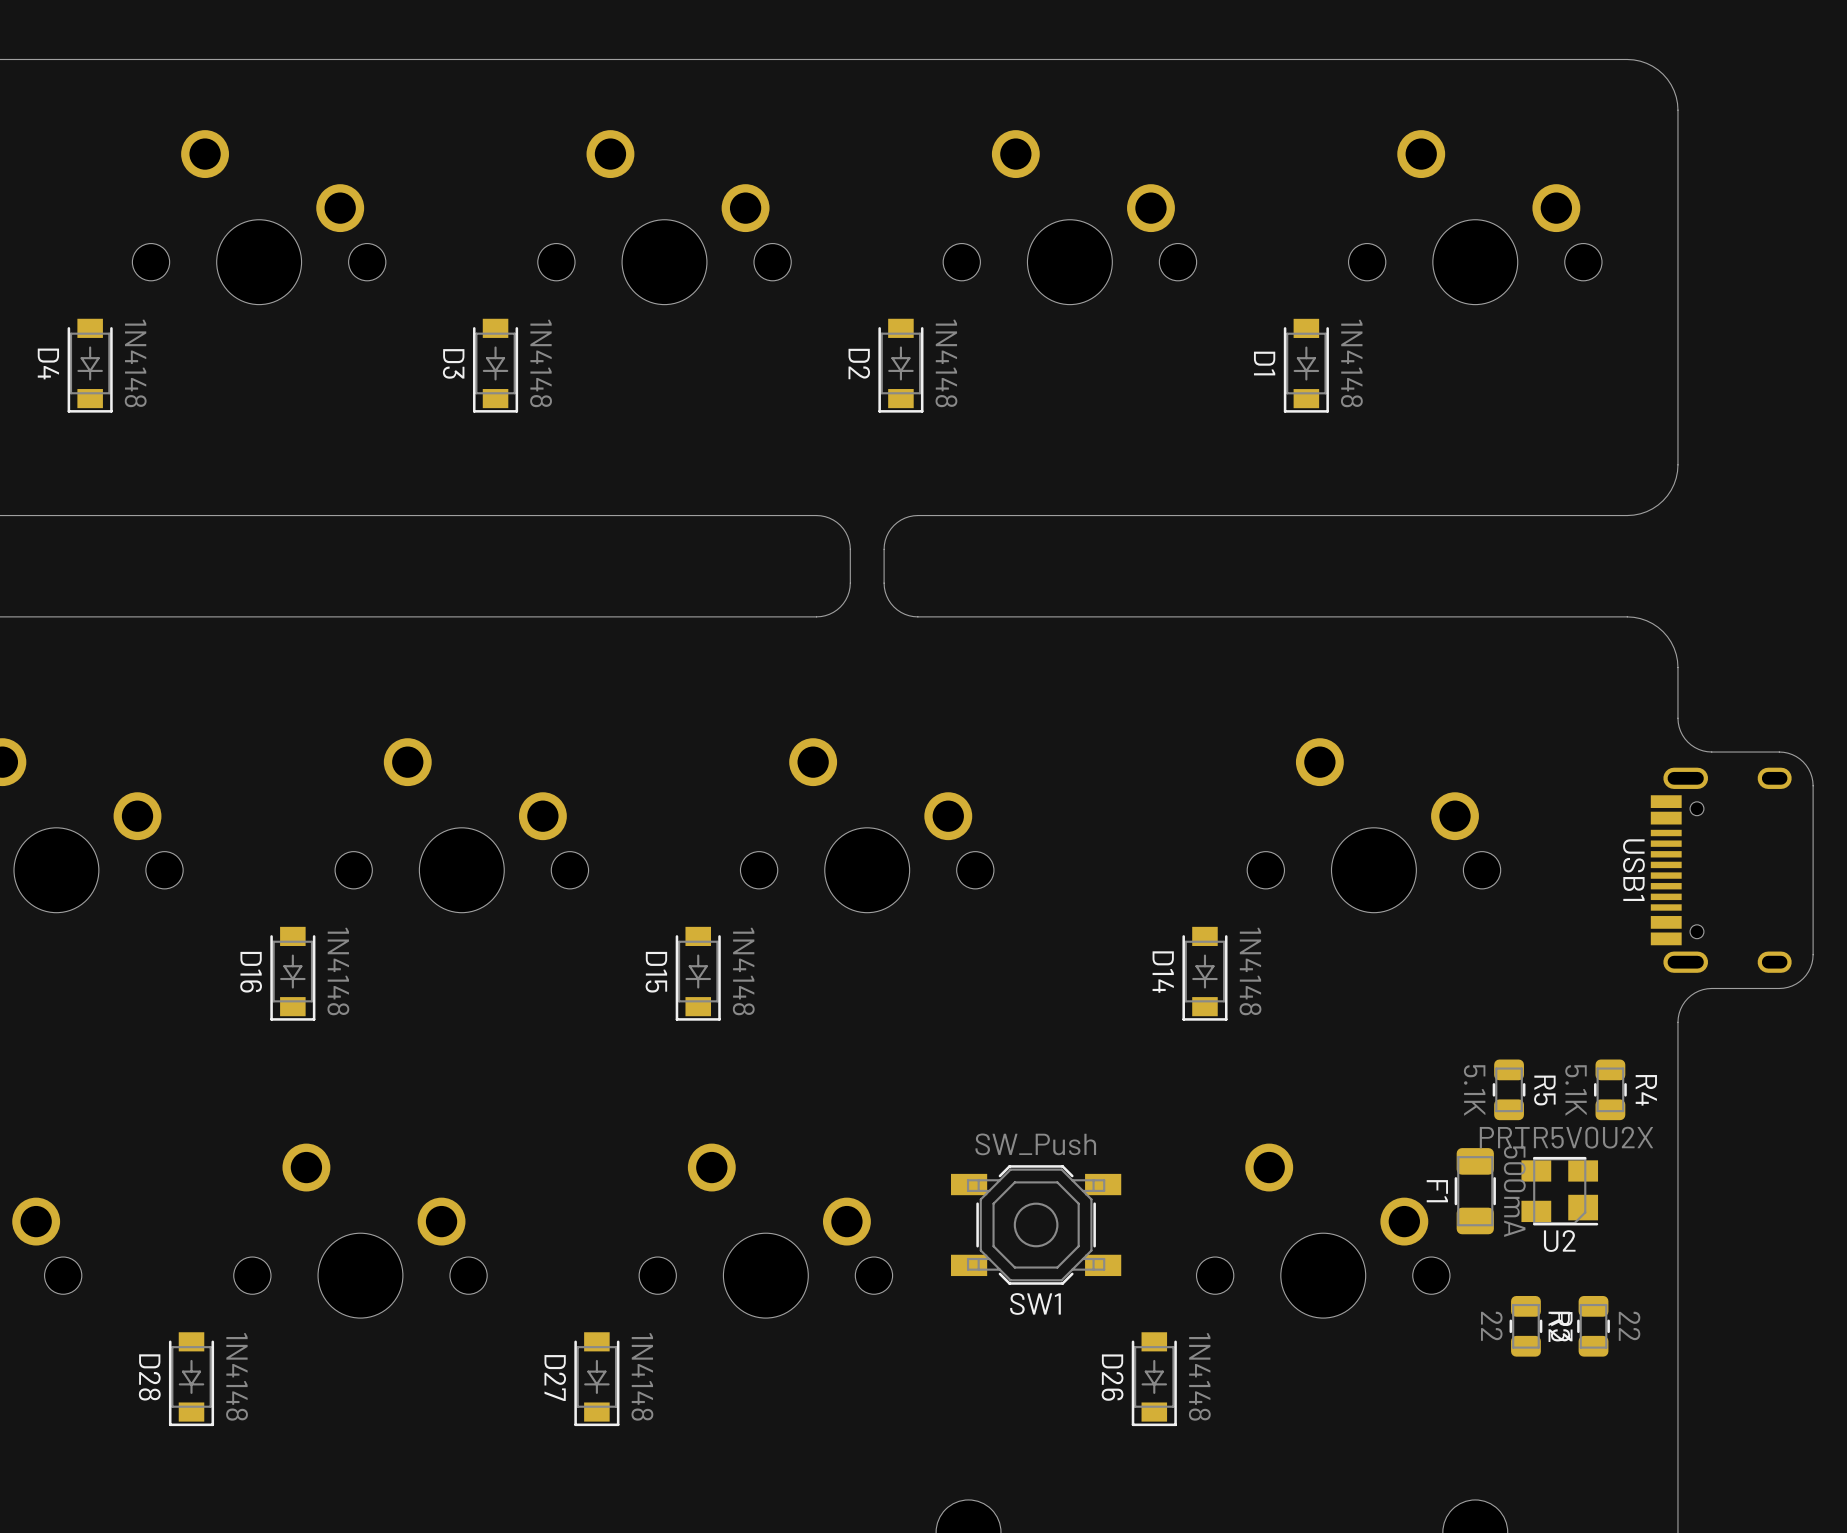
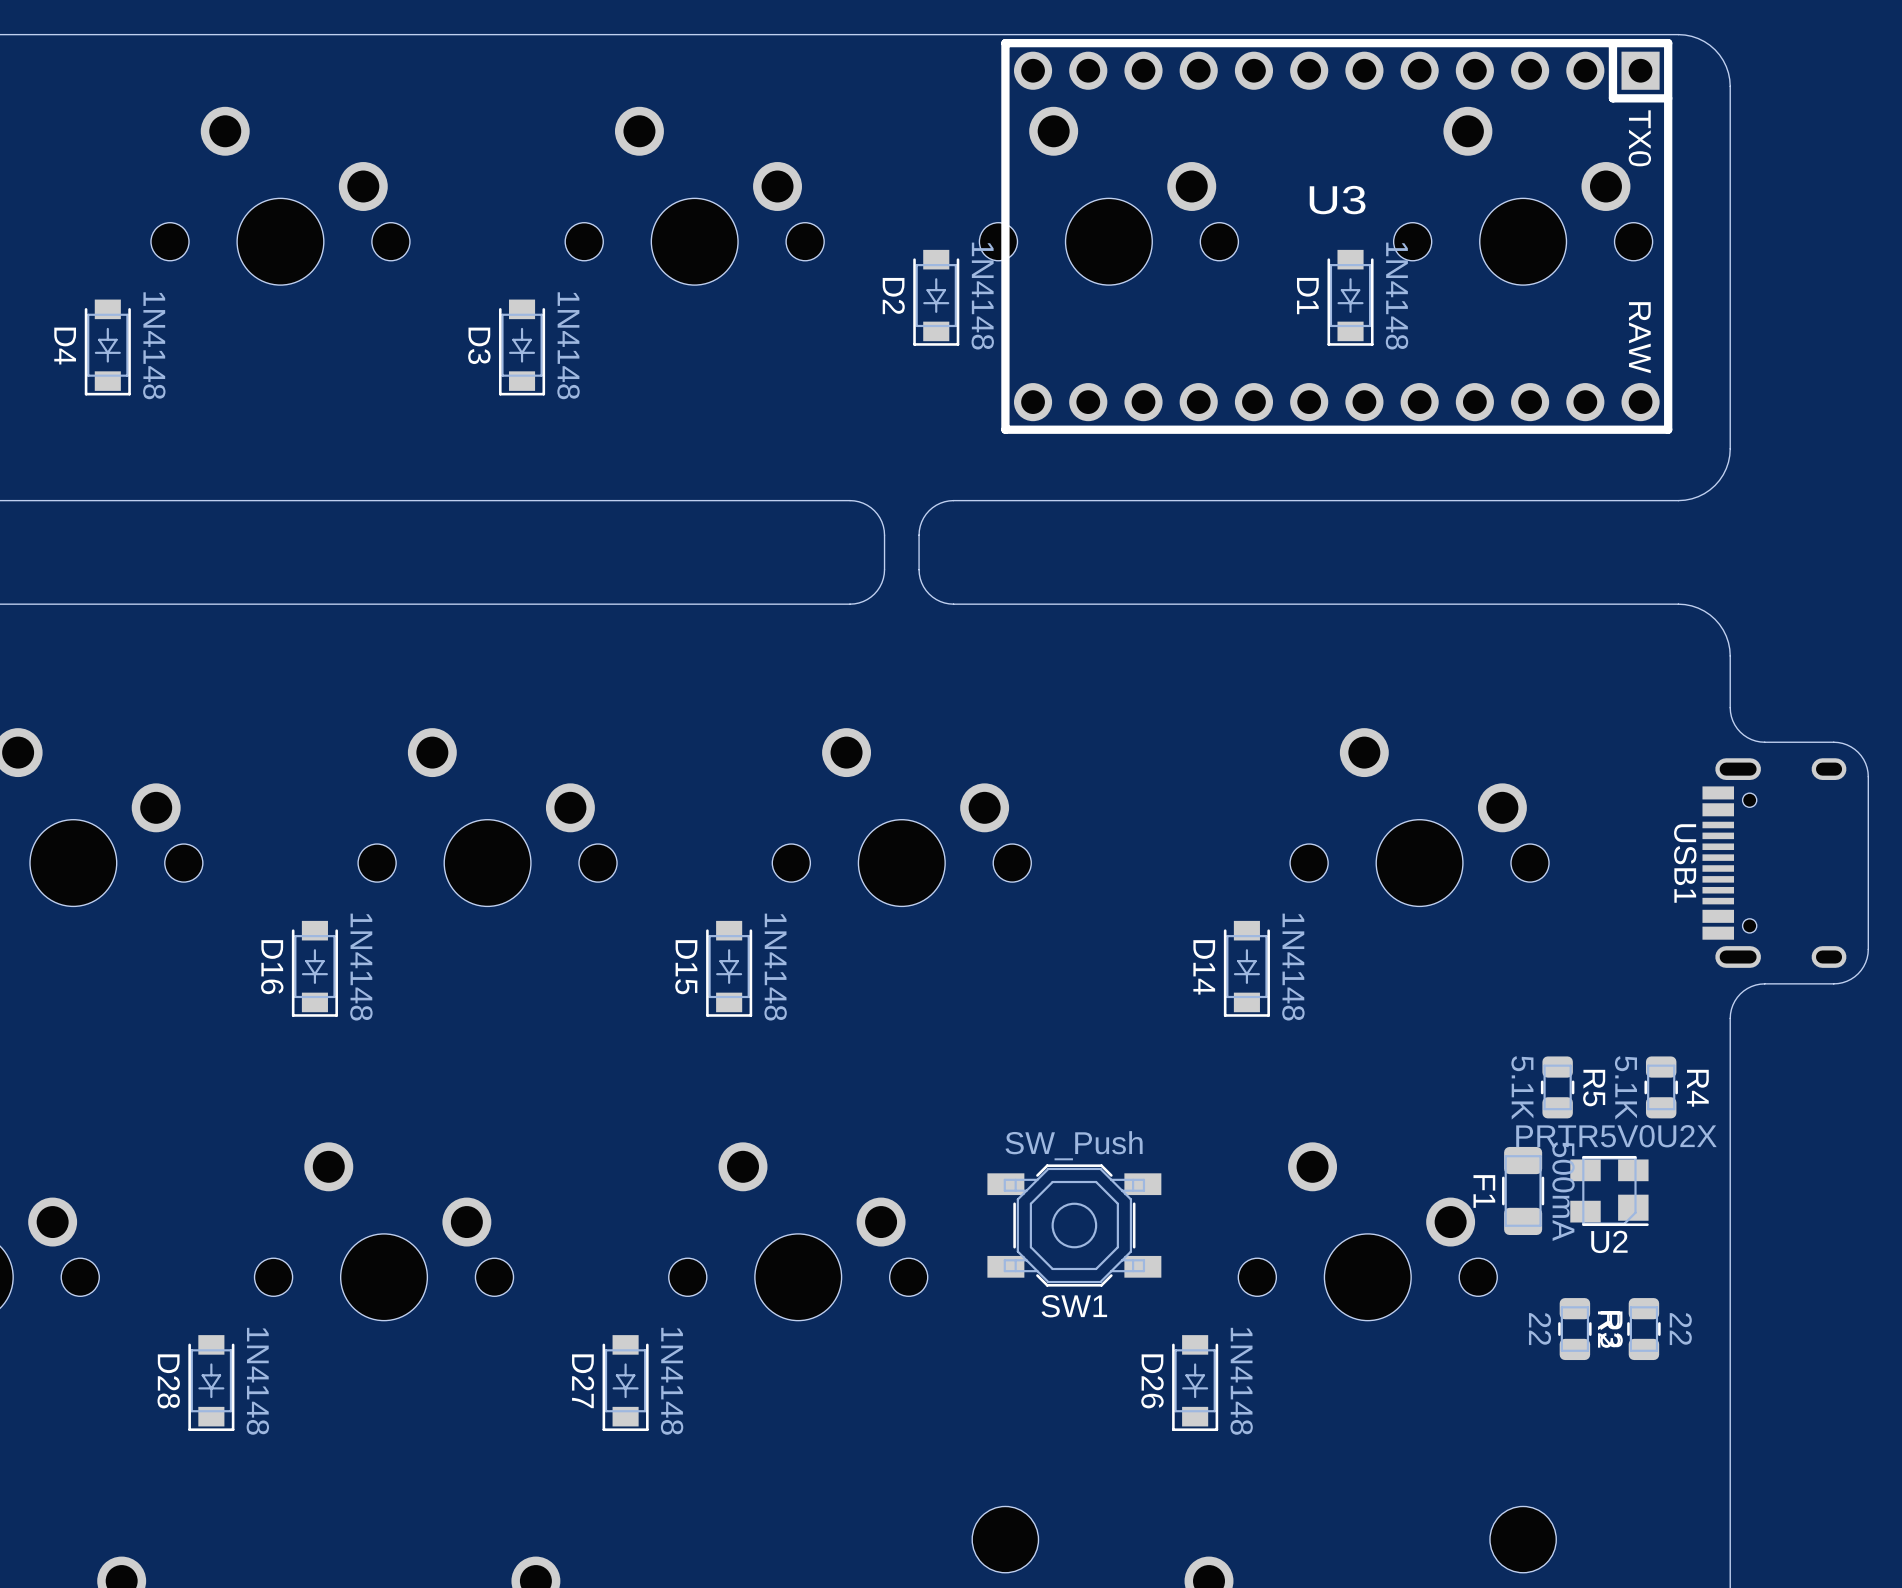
U3: none -> (1336, 236)
D2 position: (900, 365) -> (936, 297)
D1 position: (1306, 365) -> (1350, 297)

